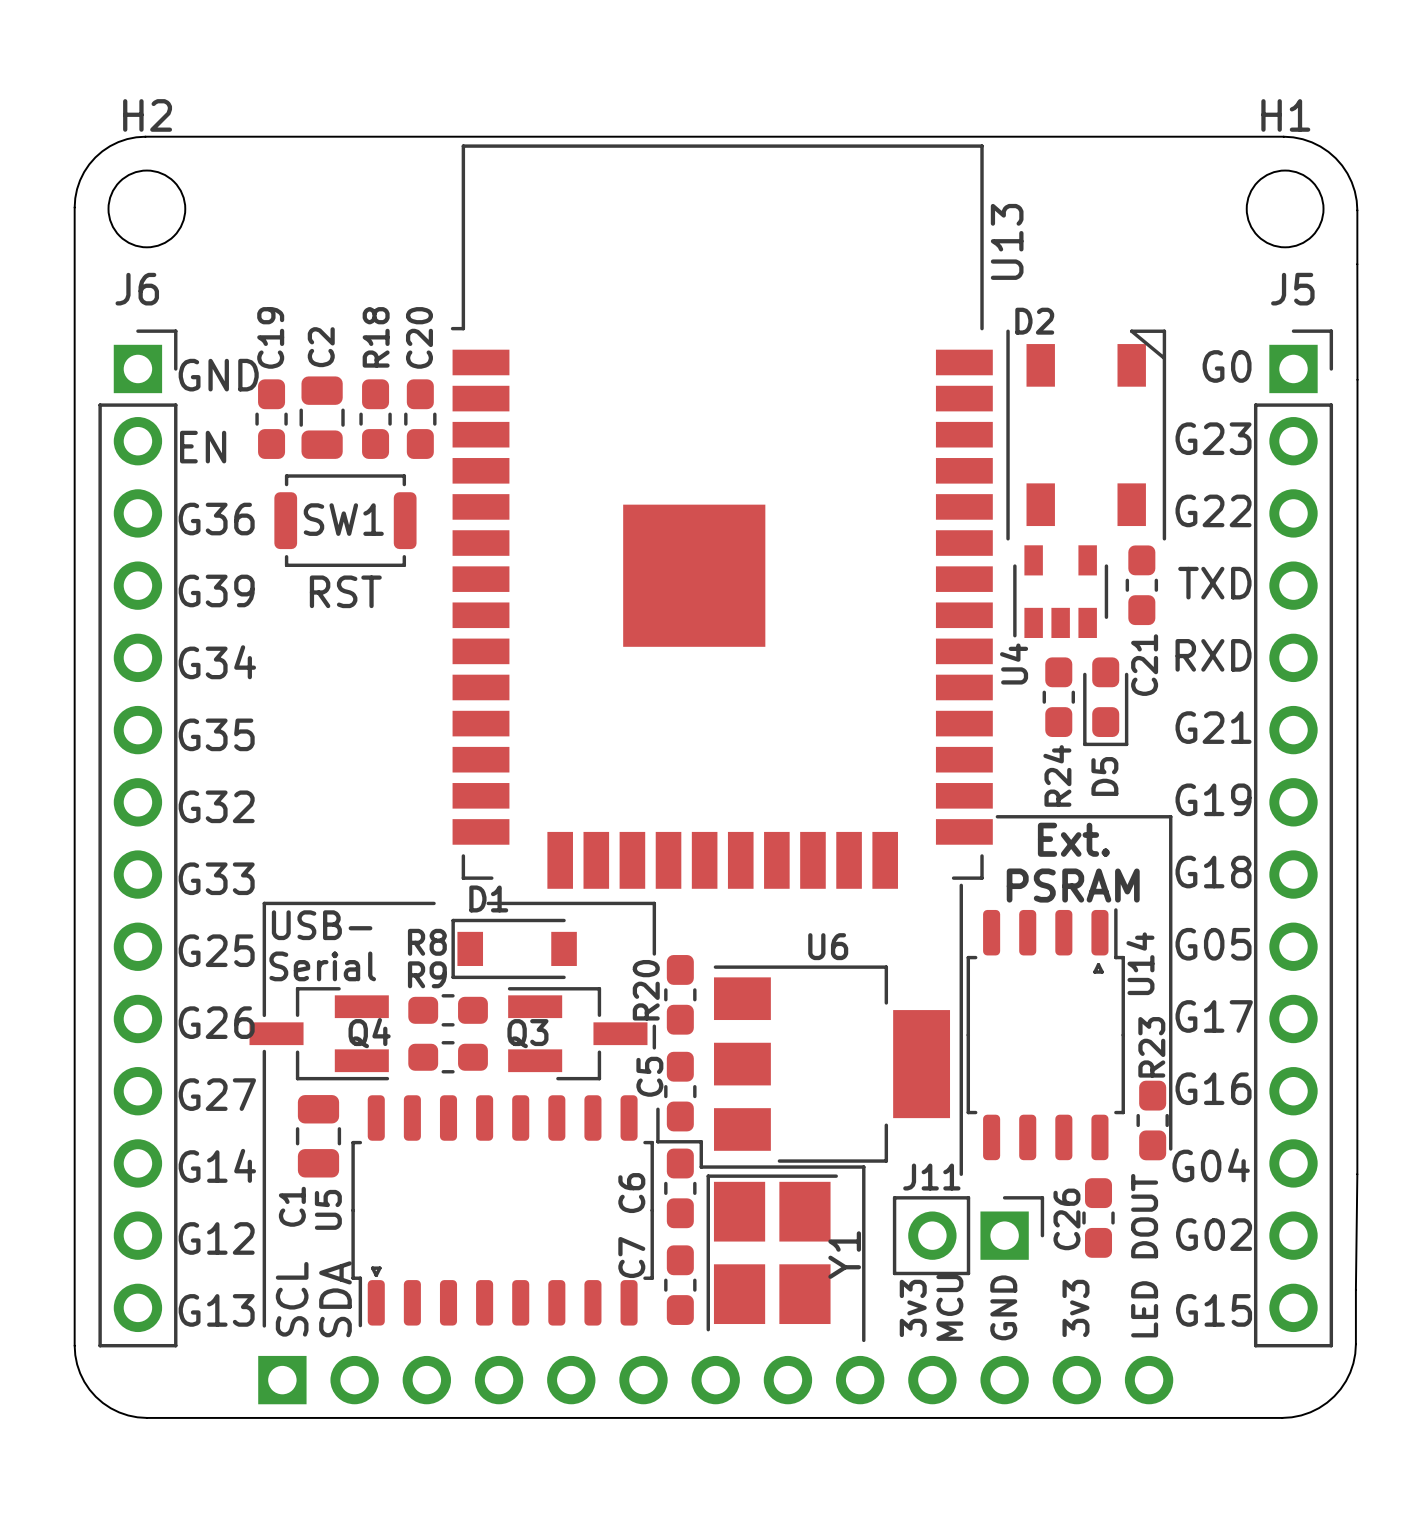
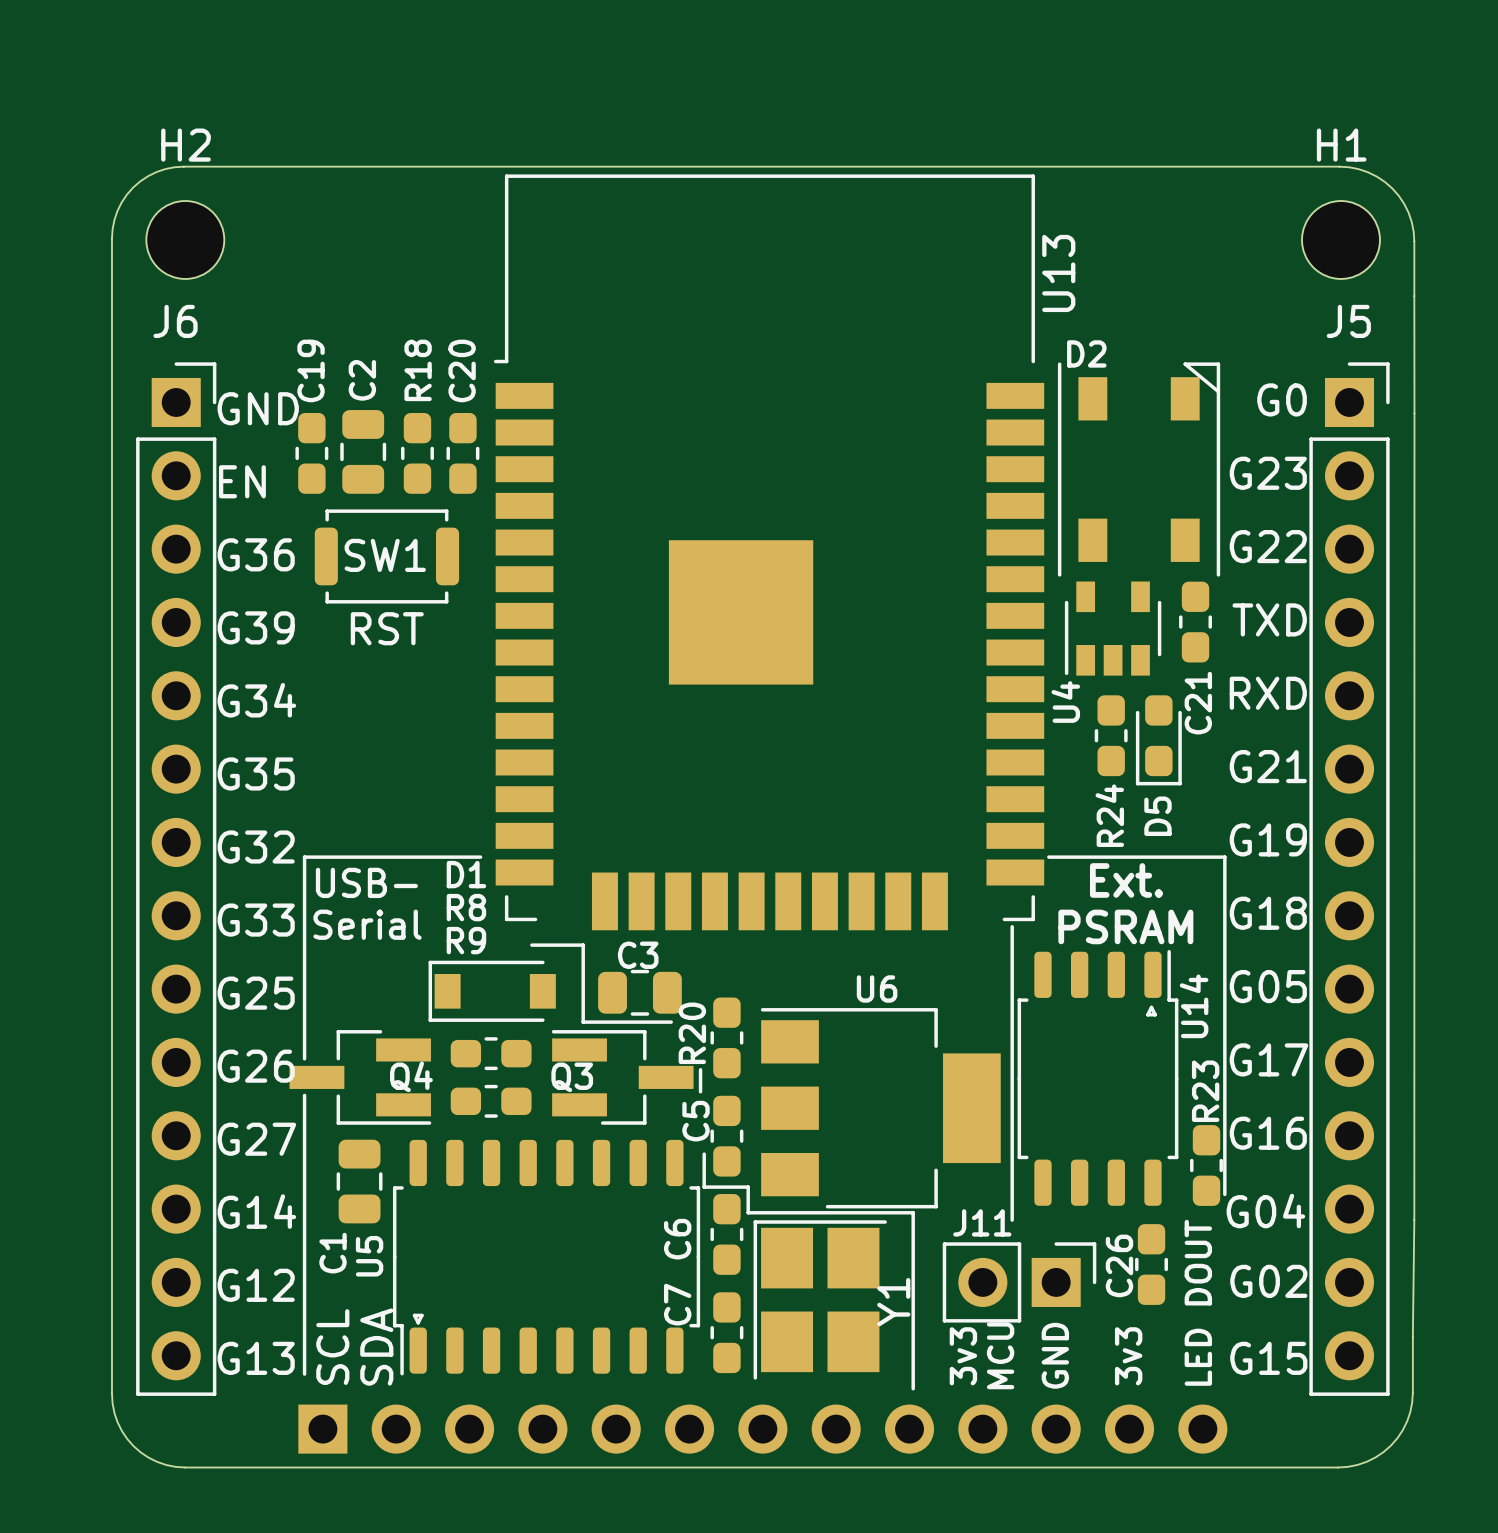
D1 name position: D1 (488, 898) -> D1 (466, 874)
line: (264, 903) (434, 903) -> (304, 945) (304, 857) (480, 857)
line: (538, 903) (654, 903) (654, 953) -> (583, 945) (583, 1022) (671, 1022)
text position: USB- (322, 925) -> USB- (366, 882)
R8 name position: R8 (427, 942) -> R8 (466, 907)
D1 position: (514, 948) -> (492, 991)
C3: none -> (639, 992)
text position: Serial (322, 966) -> Serial (367, 924)
R9 name position: R9 (427, 974) -> R9 (466, 940)

